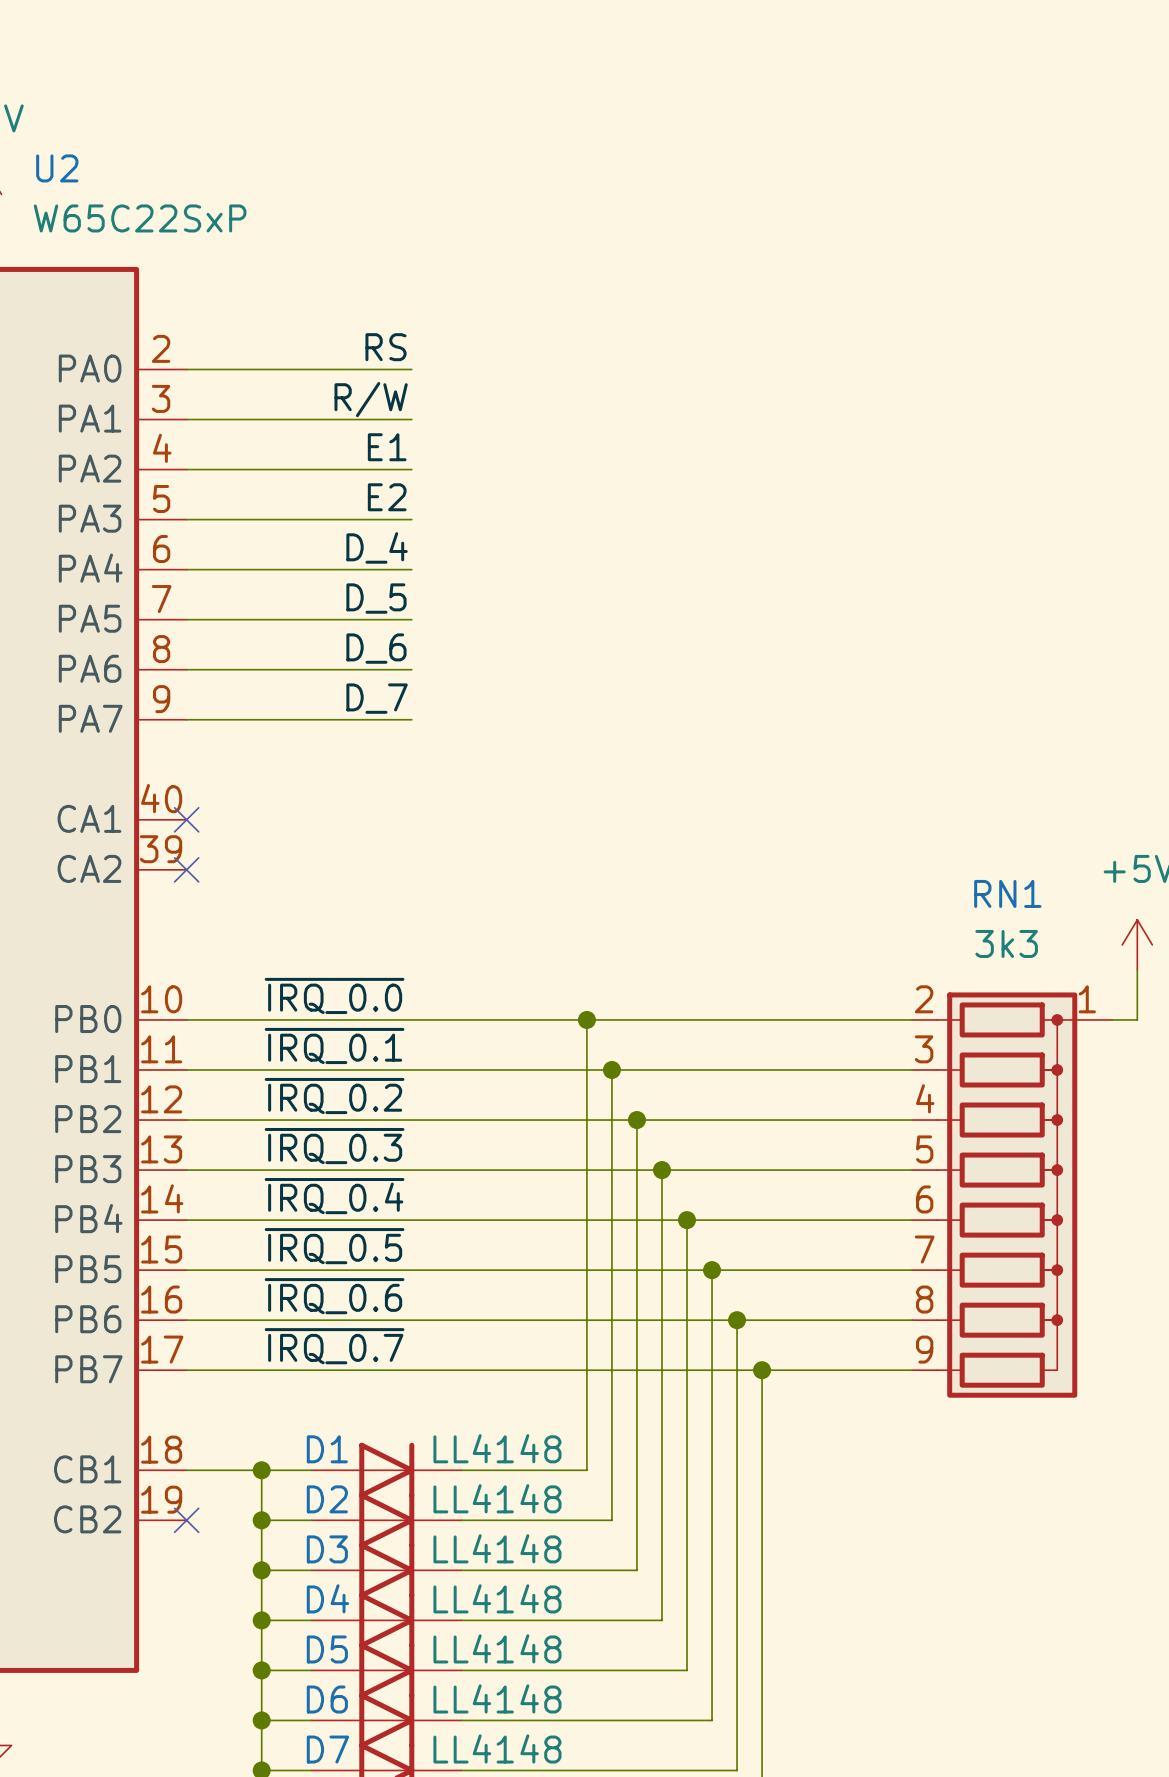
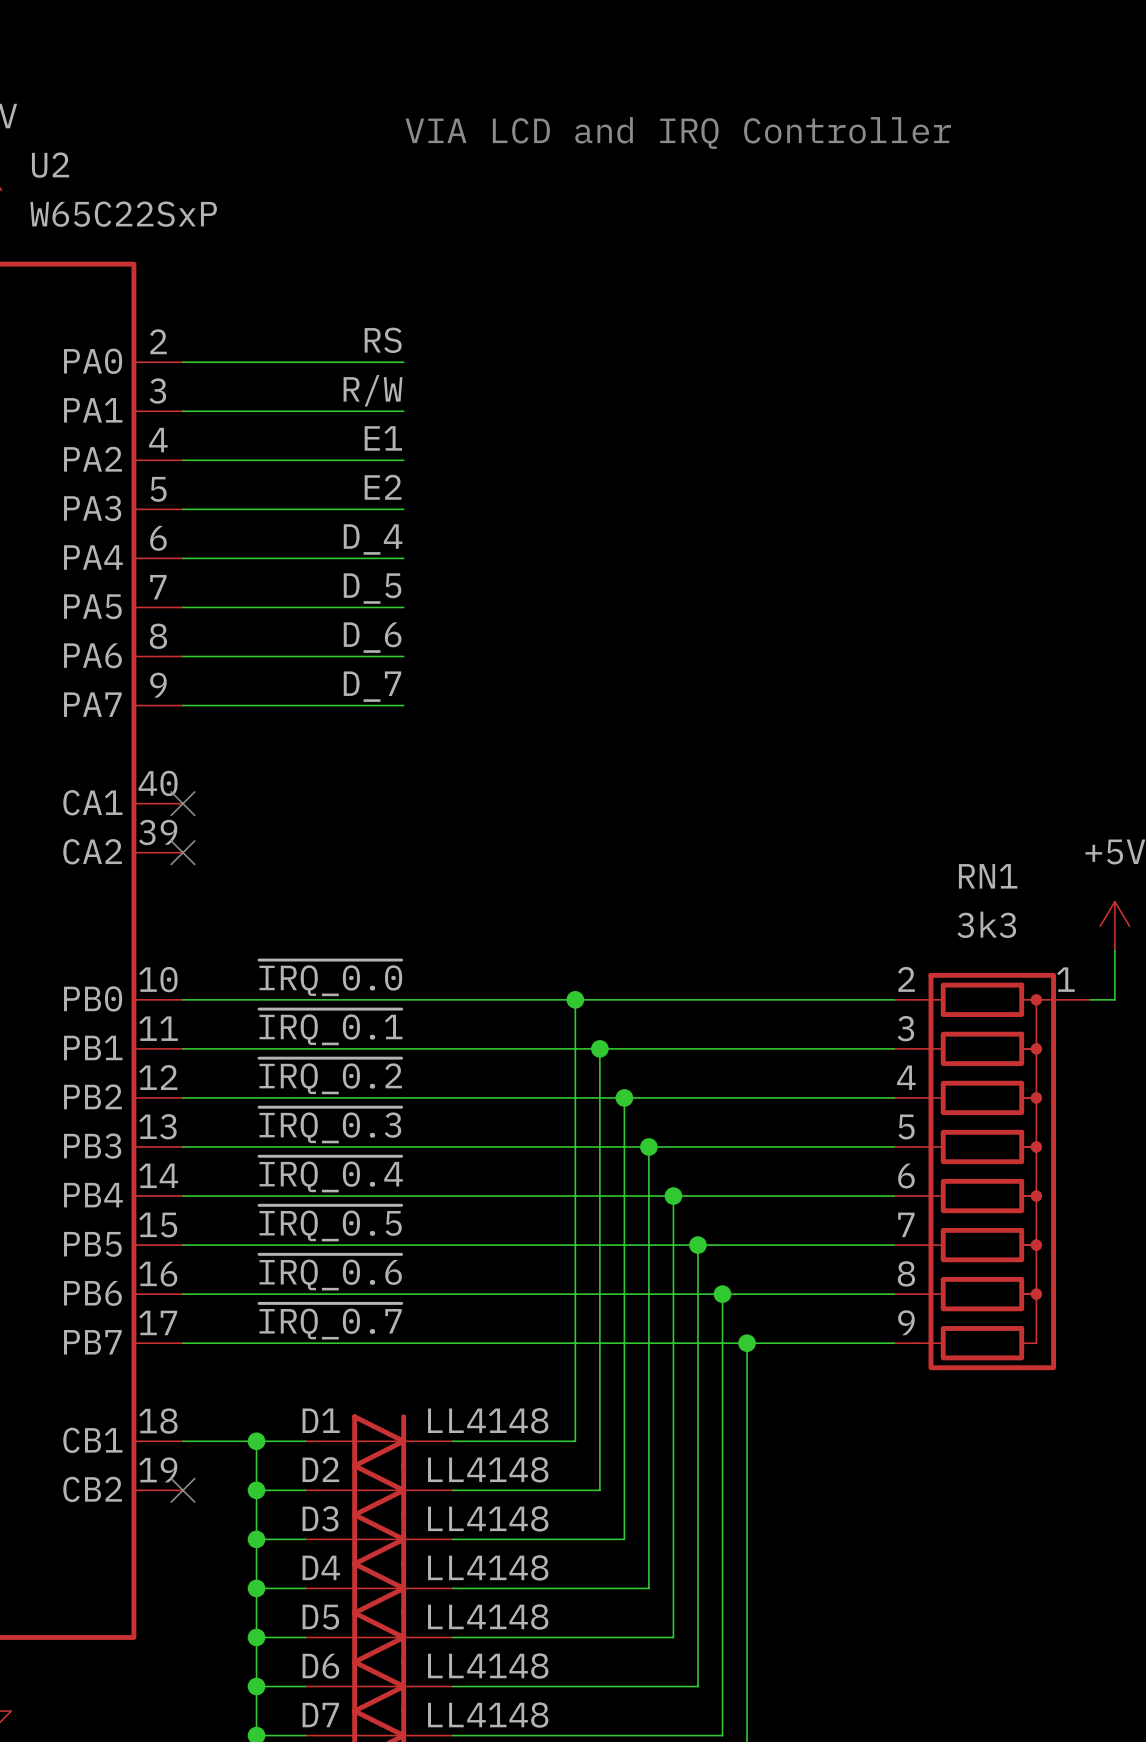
text: none -> VIA LCD and IRQ Controller (678, 132)

